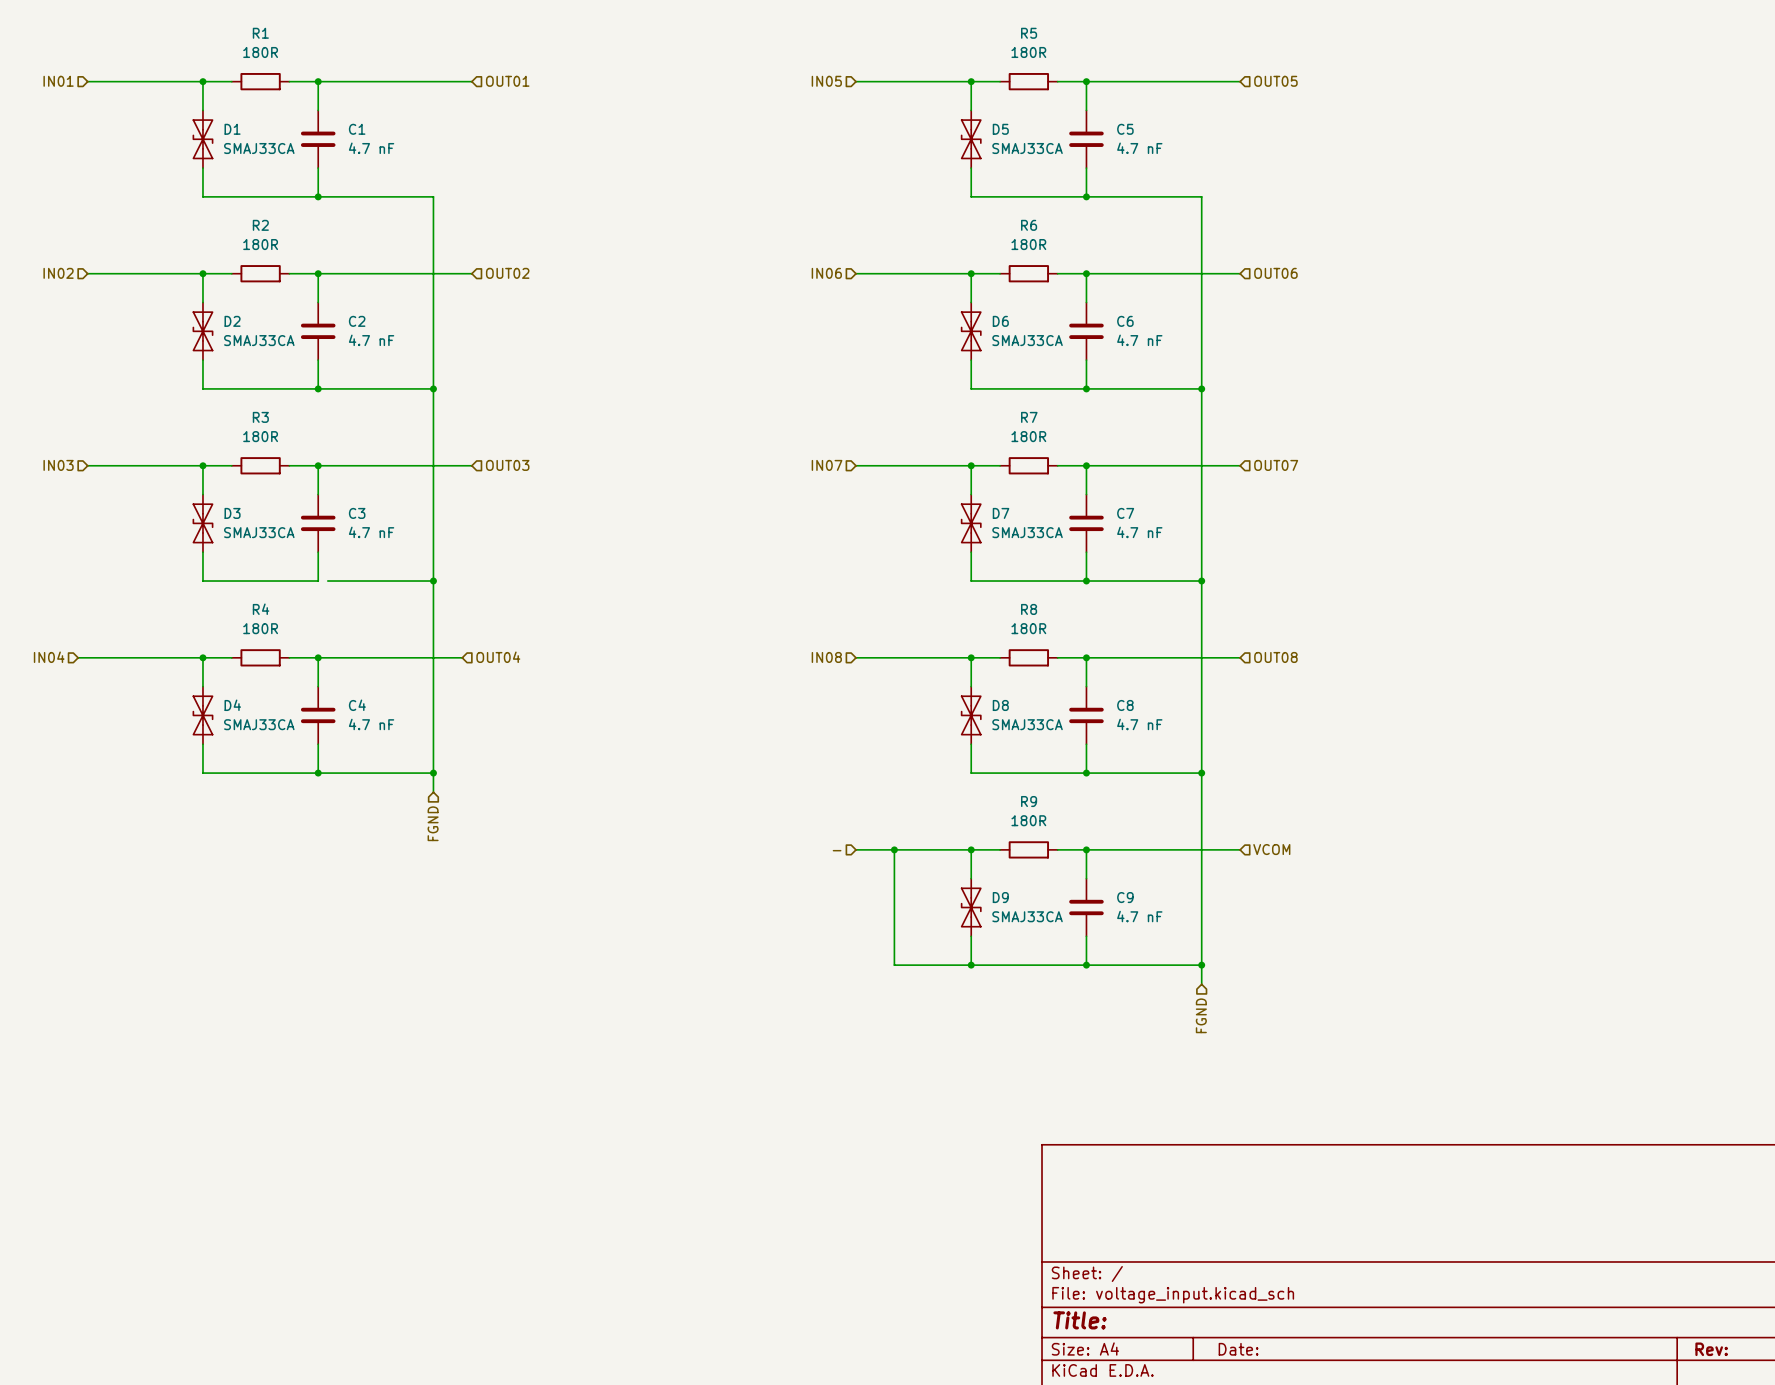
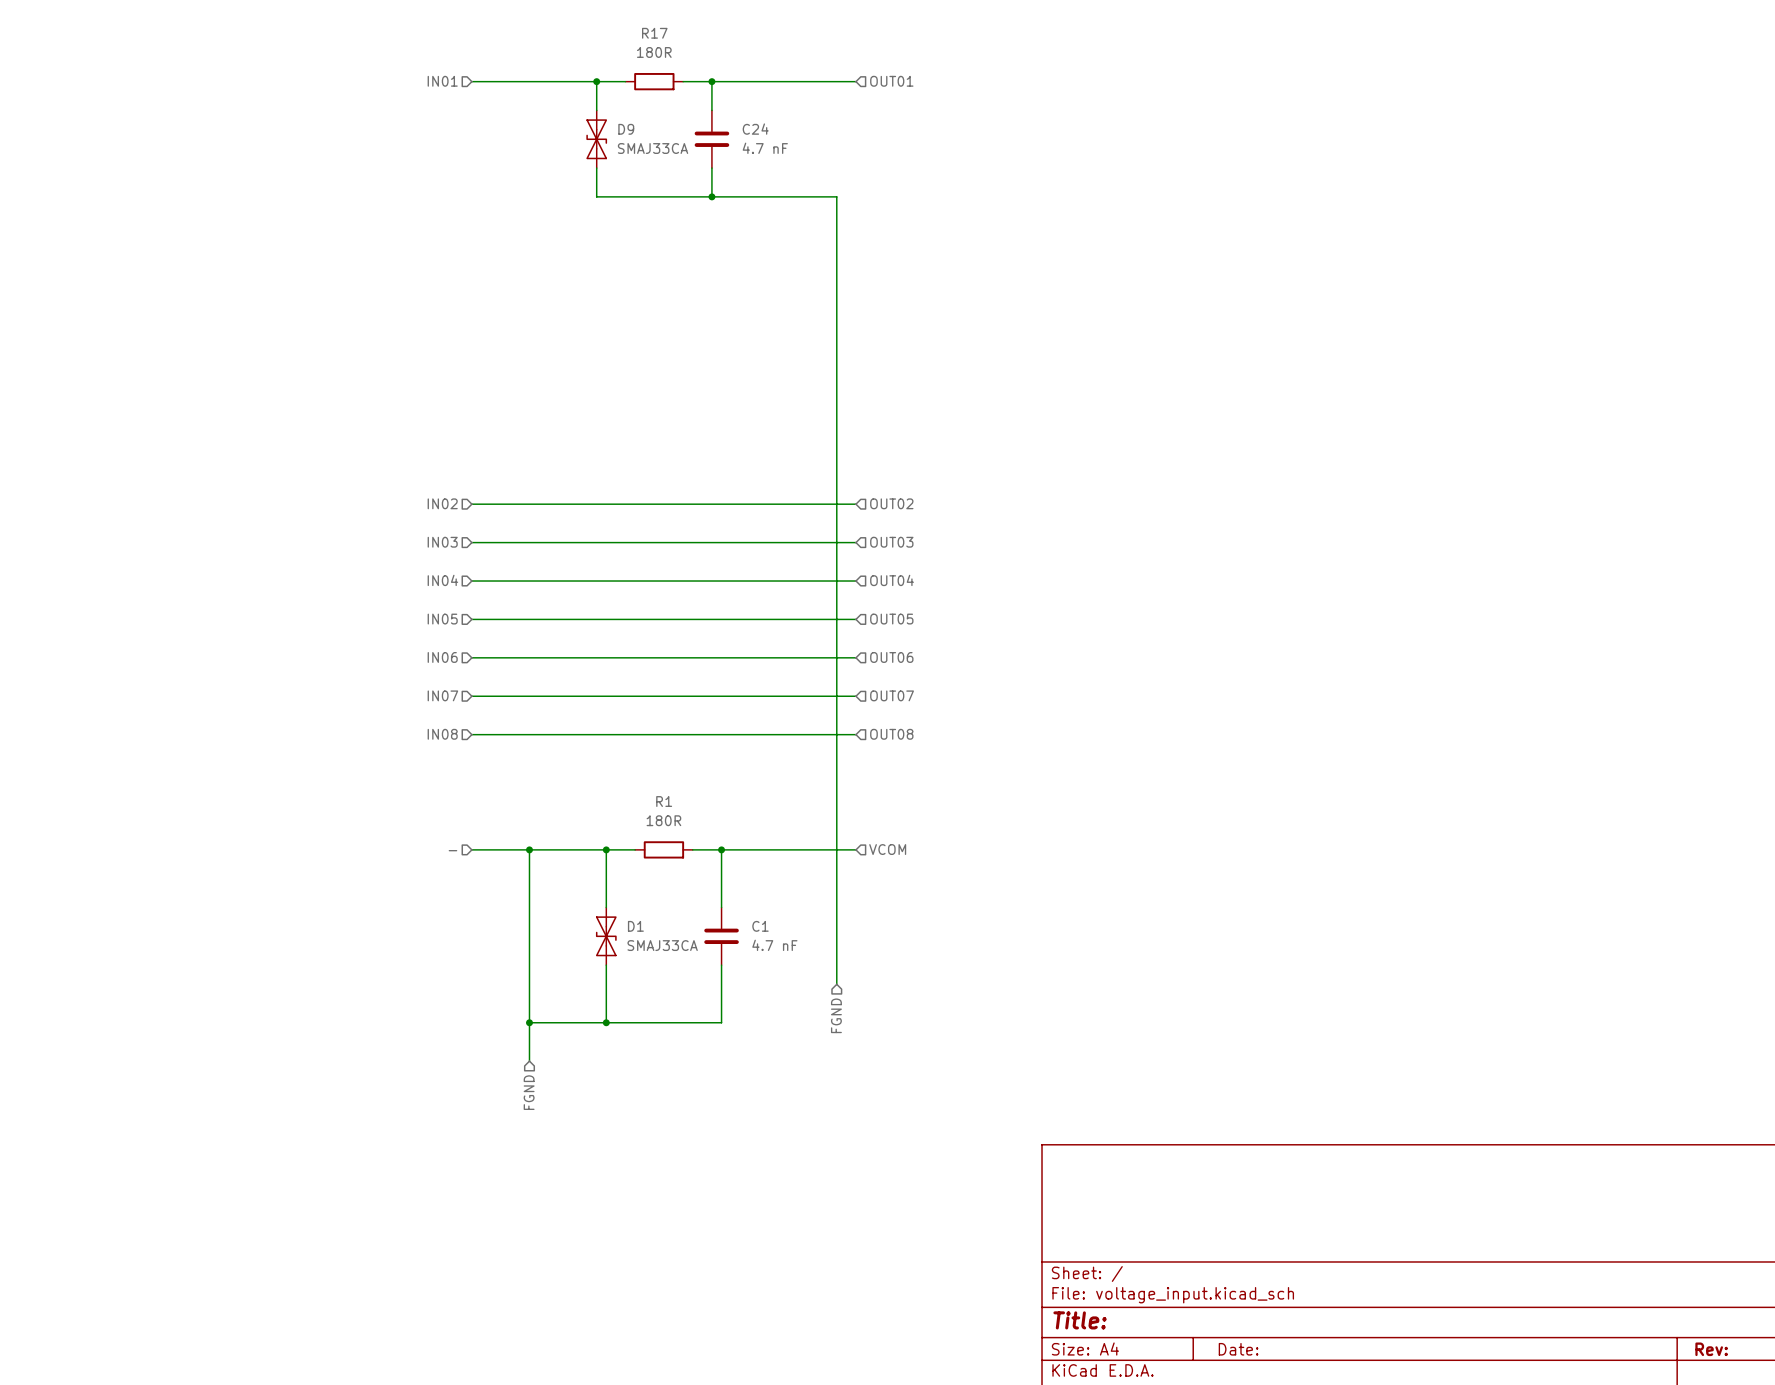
hierarchical label: IN01 (58, 81) -> none
wire: (87, 81) (231, 81) -> none
wire: (202, 81) (202, 110) -> none
junction: (202, 81) -> none
R1 position: (260, 81) -> (663, 849)
wire: (289, 81) (471, 81) -> (625, 81) (471, 81)
wire: (318, 81) (318, 110) -> none
junction: (318, 81) -> none
hierarchical label: none -> IN01 (442, 81)
hierarchical label: OUT01 (507, 81) -> none
wire: none -> (596, 81) (596, 110)
junction: none -> (596, 81)
R17: none -> 180R (654, 81)
wire: none -> (711, 81) (711, 110)
junction: none -> (711, 81)
hierarchical label: IN05 (826, 81) -> none
wire: (855, 81) (1000, 81) -> (855, 81) (683, 81)
hierarchical label: none -> OUT01 (891, 81)
wire: (971, 81) (971, 110) -> none
junction: (971, 81) -> none
R5: 180R (1028, 81) -> none
wire: (1057, 81) (1240, 81) -> none
wire: (1086, 81) (1086, 110) -> none
junction: (1086, 81) -> none
hierarchical label: OUT05 (1275, 81) -> none
D1 position: (202, 139) -> (606, 936)
C1 position: (318, 139) -> (721, 936)
C24: none -> 4.7 nF (711, 139)
D5: SMAJ33CA (971, 139) -> none
C5: 4.7 nF (1086, 139) -> none
wire: (202, 168) (202, 196) (433, 196) (433, 792) -> none
wire: (318, 168) (318, 196) -> none
wire: none -> (596, 168) (596, 196) (836, 196) (836, 984)
wire: none -> (711, 168) (711, 196)
wire: (971, 168) (971, 196) (1201, 196) (1201, 984) -> none
wire: (1086, 168) (1086, 196) -> none
junction: (318, 196) -> none
junction: none -> (711, 196)
junction: (1086, 196) -> none
hierarchical label: IN02 (58, 273) -> none
wire: (87, 273) (231, 273) -> none
wire: (202, 273) (202, 302) -> none
junction: (202, 273) -> none
R2: 180R (260, 273) -> none
wire: (289, 273) (471, 273) -> none
wire: (318, 273) (318, 302) -> none
junction: (318, 273) -> none
hierarchical label: OUT02 (507, 273) -> none
hierarchical label: IN06 (826, 273) -> none
wire: (855, 273) (1000, 273) -> none
wire: (971, 273) (971, 302) -> none
junction: (971, 273) -> none
R6: 180R (1028, 273) -> none
wire: (1057, 273) (1240, 273) -> none
wire: (1086, 273) (1086, 302) -> none
junction: (1086, 273) -> none
hierarchical label: OUT06 (1275, 273) -> none
D2: SMAJ33CA (202, 331) -> none
C2: 4.7 nF (318, 331) -> none
D6: SMAJ33CA (971, 331) -> none
C6: 4.7 nF (1086, 331) -> none
wire: (202, 360) (202, 388) (433, 388) -> none
wire: (318, 360) (318, 388) -> none
wire: (971, 360) (971, 388) (1201, 388) -> none
wire: (1086, 360) (1086, 388) -> none
junction: (318, 388) -> none
junction: (433, 388) -> none
junction: (1086, 388) -> none
junction: (1201, 388) -> none
hierarchical label: IN03 (58, 465) -> none
wire: (87, 465) (231, 465) -> none
wire: (202, 465) (202, 494) -> none
junction: (202, 465) -> none
R3: 180R (260, 465) -> none
wire: (289, 465) (471, 465) -> none
wire: (318, 465) (318, 494) -> none
junction: (318, 465) -> none
hierarchical label: OUT03 (507, 465) -> none
hierarchical label: IN07 (827, 465) -> none
wire: (855, 465) (1000, 465) -> none
wire: (971, 465) (971, 494) -> none
junction: (971, 465) -> none
R7: 180R (1028, 465) -> none
wire: (1057, 465) (1240, 465) -> none
wire: (1086, 465) (1086, 494) -> none
junction: (1086, 465) -> none
hierarchical label: OUT07 (1276, 465) -> none
hierarchical label: none -> IN02 (442, 503)
hierarchical label: none -> OUT02 (891, 503)
wire: none -> (471, 504) (855, 504)
D3: SMAJ33CA (202, 523) -> none
C3: 4.7 nF (318, 523) -> none
D7: SMAJ33CA (971, 523) -> none
C7: 4.7 nF (1086, 523) -> none
hierarchical label: none -> IN03 (442, 542)
wire: none -> (471, 542) (855, 542)
hierarchical label: none -> OUT03 (891, 542)
wire: (202, 552) (202, 581) (318, 581) (318, 552) -> none
wire: (971, 552) (971, 581) (1201, 581) -> none
wire: (1086, 552) (1086, 581) -> none
hierarchical label: none -> IN04 (442, 580)
hierarchical label: none -> OUT04 (892, 580)
wire: (327, 581) (433, 581) -> none
junction: (433, 581) -> none
wire: none -> (471, 581) (855, 581)
junction: (1086, 581) -> none
junction: (1201, 581) -> none
hierarchical label: none -> IN05 (442, 619)
wire: none -> (471, 619) (855, 619)
hierarchical label: none -> OUT05 (891, 619)
hierarchical label: IN04 (49, 657) -> none
wire: (78, 657) (231, 657) -> none
wire: (202, 657) (202, 686) -> none
junction: (202, 657) -> none
R4: 180R (260, 657) -> none
wire: (289, 657) (462, 657) -> none
wire: (318, 657) (318, 686) -> none
junction: (318, 657) -> none
hierarchical label: none -> IN06 (442, 657)
hierarchical label: OUT04 (498, 657) -> none
hierarchical label: IN08 (826, 657) -> none
wire: (855, 657) (1000, 657) -> (855, 657) (471, 657)
hierarchical label: none -> OUT06 (891, 657)
wire: (971, 657) (971, 686) -> none
junction: (971, 657) -> none
R8: 180R (1028, 657) -> none
wire: (1057, 657) (1240, 657) -> none
wire: (1086, 657) (1086, 686) -> none
junction: (1086, 657) -> none
hierarchical label: OUT08 (1275, 657) -> none
hierarchical label: none -> IN07 (442, 695)
hierarchical label: none -> OUT07 (892, 695)
wire: none -> (471, 696) (855, 696)
D4: SMAJ33CA (202, 715) -> none
C4: 4.7 nF (318, 715) -> none
D8: SMAJ33CA (971, 715) -> none
C8: 4.7 nF (1086, 715) -> none
hierarchical label: none -> IN08 (442, 734)
wire: none -> (471, 734) (855, 734)
hierarchical label: none -> OUT08 (891, 734)
wire: (202, 744) (202, 773) (433, 773) -> none
wire: (318, 744) (318, 773) -> none
wire: (971, 744) (971, 773) (1201, 773) -> none
wire: (1086, 744) (1086, 773) -> none
junction: (318, 773) -> none
junction: (433, 773) -> none
junction: (1086, 773) -> none
junction: (1201, 773) -> none
hierarchical label: FGND (433, 823) -> none
wire: none -> (471, 849) (635, 849)
wire: none -> (529, 849) (529, 1061)
junction: none -> (529, 849)
wire: none -> (606, 849) (606, 907)
junction: none -> (606, 849)
wire: none -> (721, 849) (721, 907)
junction: none -> (721, 849)
wire: (855, 849) (1000, 849) -> (855, 849) (692, 849)
hierarchical label: none -> VCOM (887, 849)
wire: (894, 849) (894, 965) (1201, 965) -> none
junction: (894, 849) -> none
wire: (971, 849) (971, 878) -> none
junction: (971, 849) -> none
R9: 180R (1028, 849) -> none
wire: (1057, 849) (1240, 849) -> none
wire: (1086, 849) (1086, 878) -> none
junction: (1086, 849) -> none
hierarchical label: VCOM (1271, 849) -> none
hierarchical label: none -> - (452, 850)
hierarchical label: - (837, 850) -> none
D9 position: (971, 907) -> (596, 139)
C9: 4.7 nF (1086, 907) -> none
wire: (971, 936) (971, 965) -> none
wire: (1086, 936) (1086, 965) -> none
wire: none -> (606, 965) (606, 1022)
wire: none -> (721, 965) (721, 1022) (529, 1022)
junction: (971, 965) -> none
junction: (1086, 965) -> none
junction: (1201, 965) -> none
hierarchical label: none -> FGND (836, 1015)
hierarchical label: FGND (1201, 1015) -> none
junction: none -> (529, 1022)
junction: none -> (606, 1022)
hierarchical label: none -> FGND (529, 1092)

